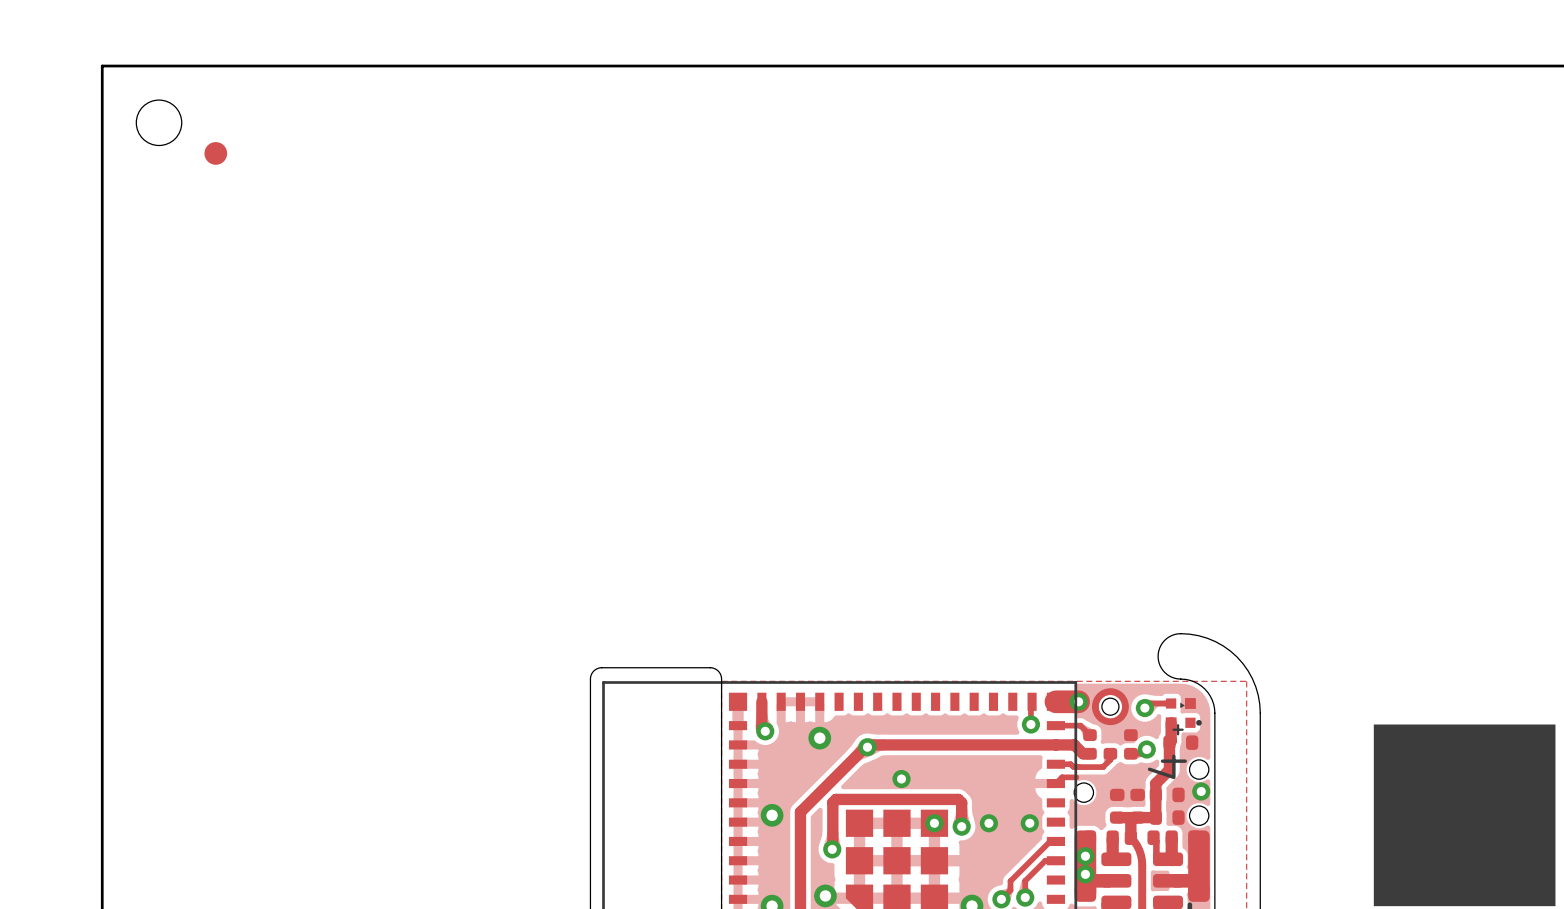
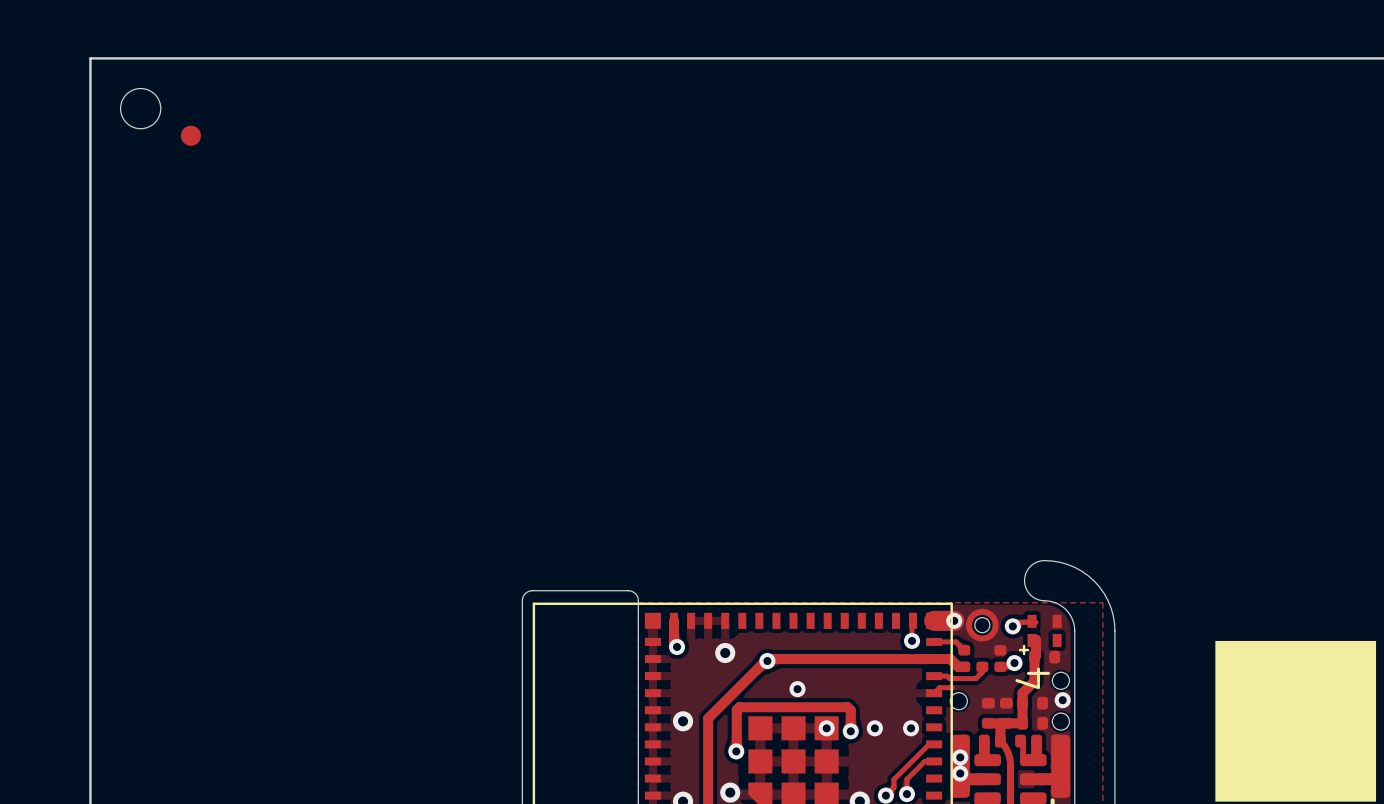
part footprint: [1165, 698, 1202, 736] -> [1018, 614, 1062, 656]

